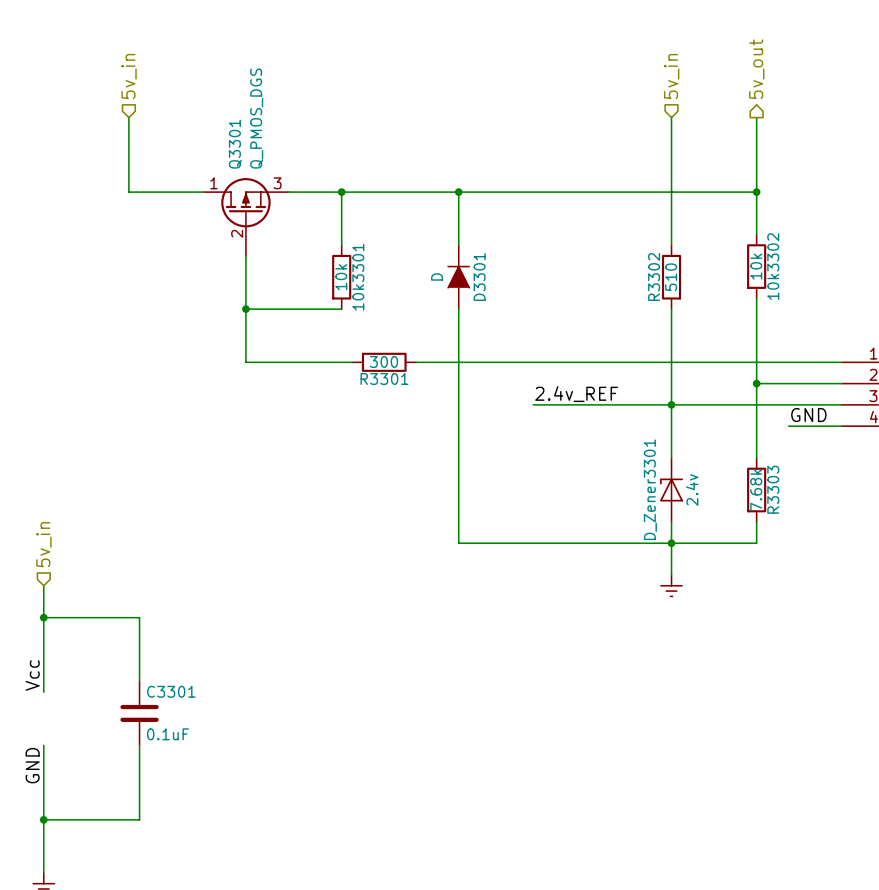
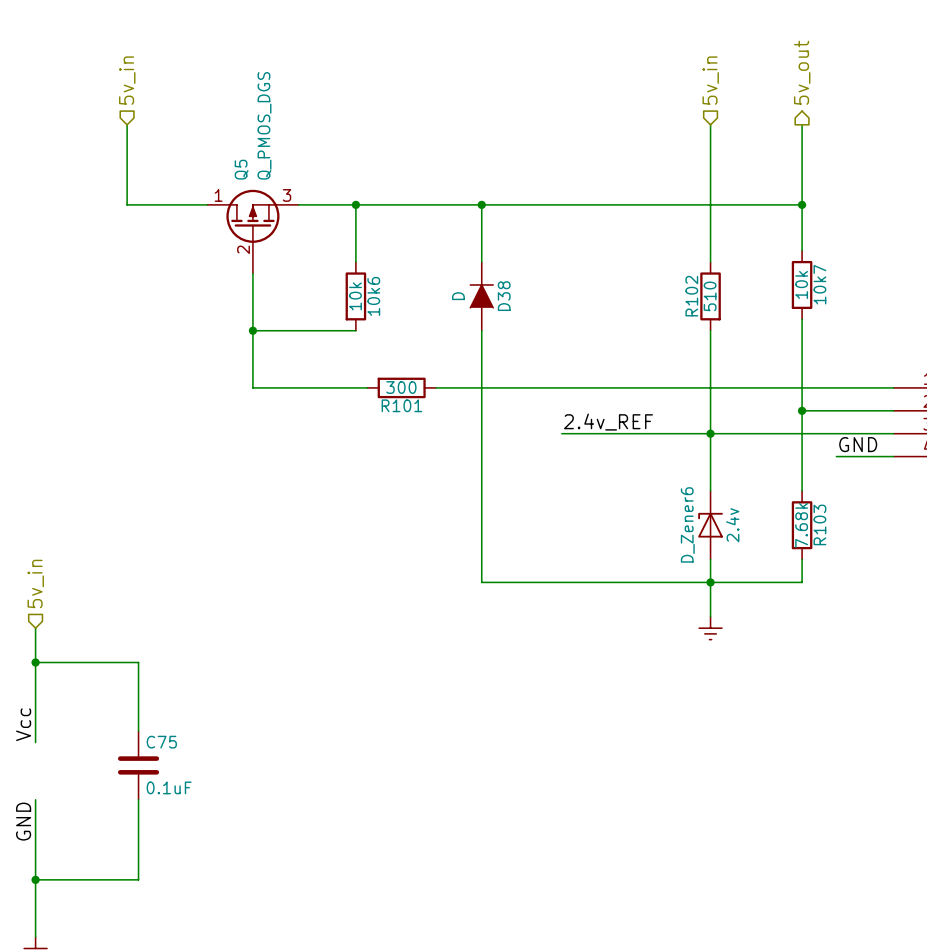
Q3301 name: Q3301 (235, 144) -> Q5 (241, 169)
10k3302 name: 10k3302 (773, 266) -> 10k7 (819, 284)
D3301 name: D3301 (479, 276) -> D38 (504, 296)
R3302 name: R3302 (654, 276) -> R102 (691, 296)
10k3301 name: 10k3301 (358, 277) -> 10k6 (373, 296)
R3301 name: R3301 (384, 378) -> R101 (401, 405)
D_Zener3301 name: D_Zener3301 (650, 489) -> D_Zener6 (687, 524)
R3303 name: R3303 (773, 489) -> R103 (819, 524)
C3301 name: C3301 (171, 691) -> C75 (161, 742)

